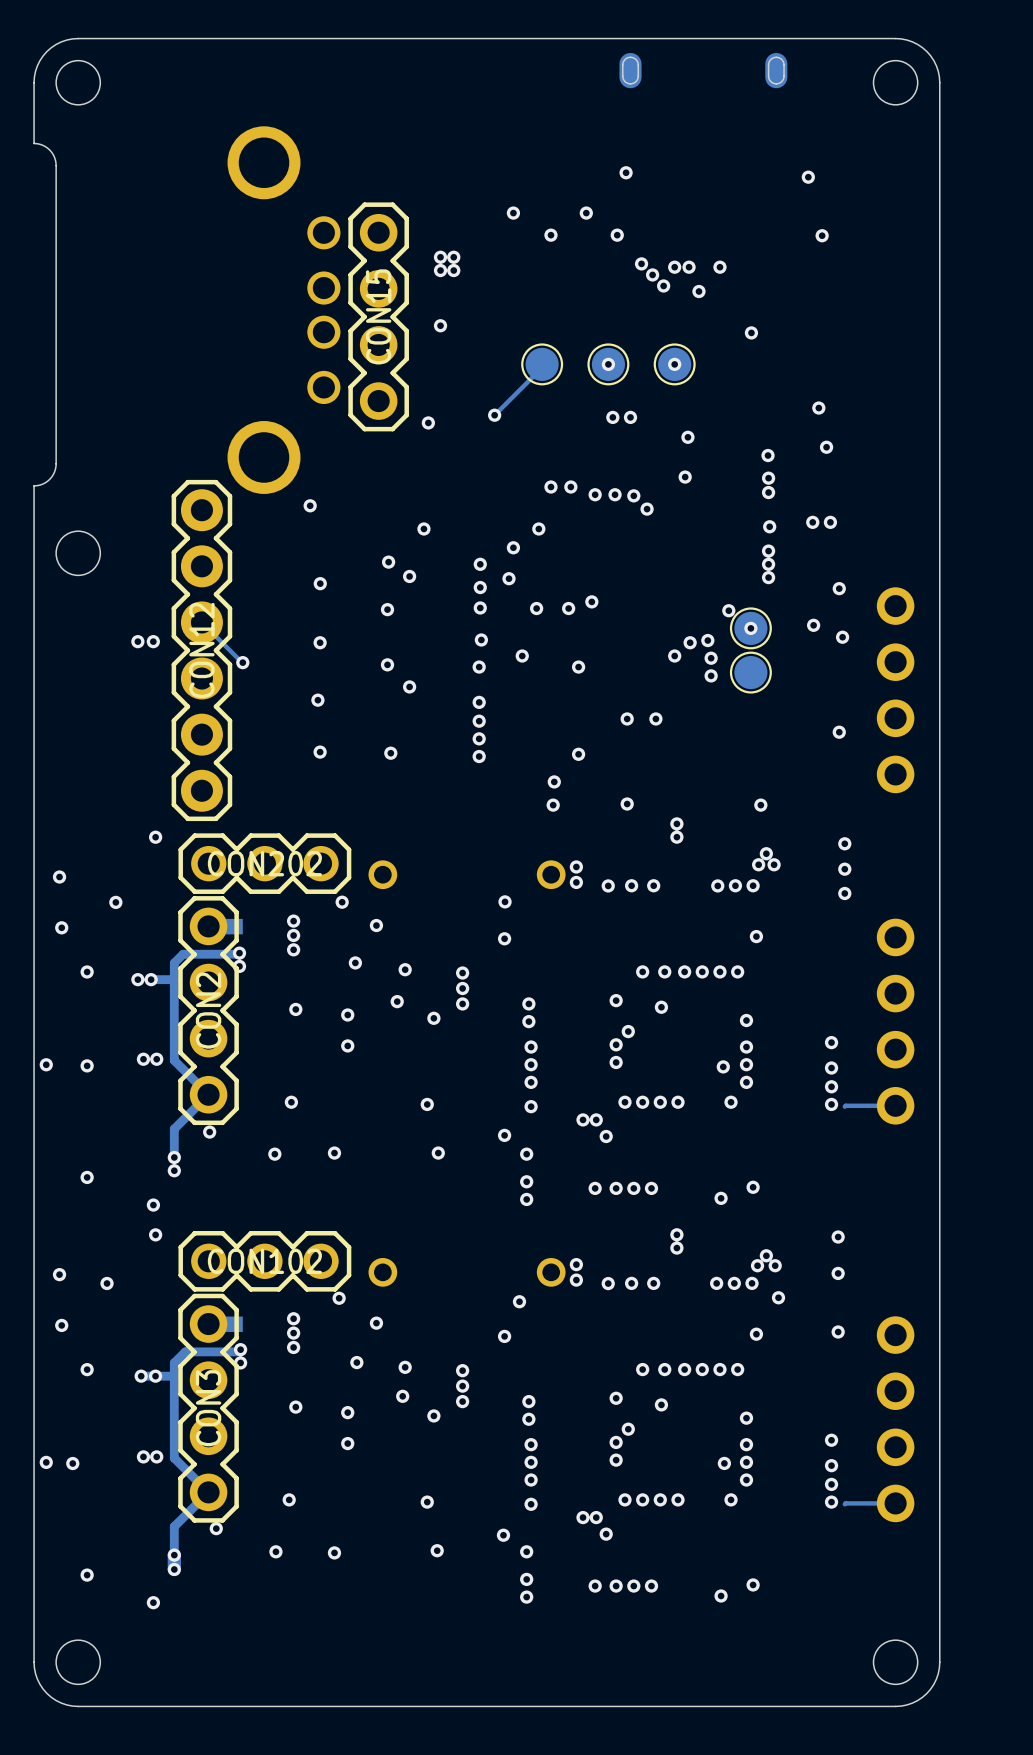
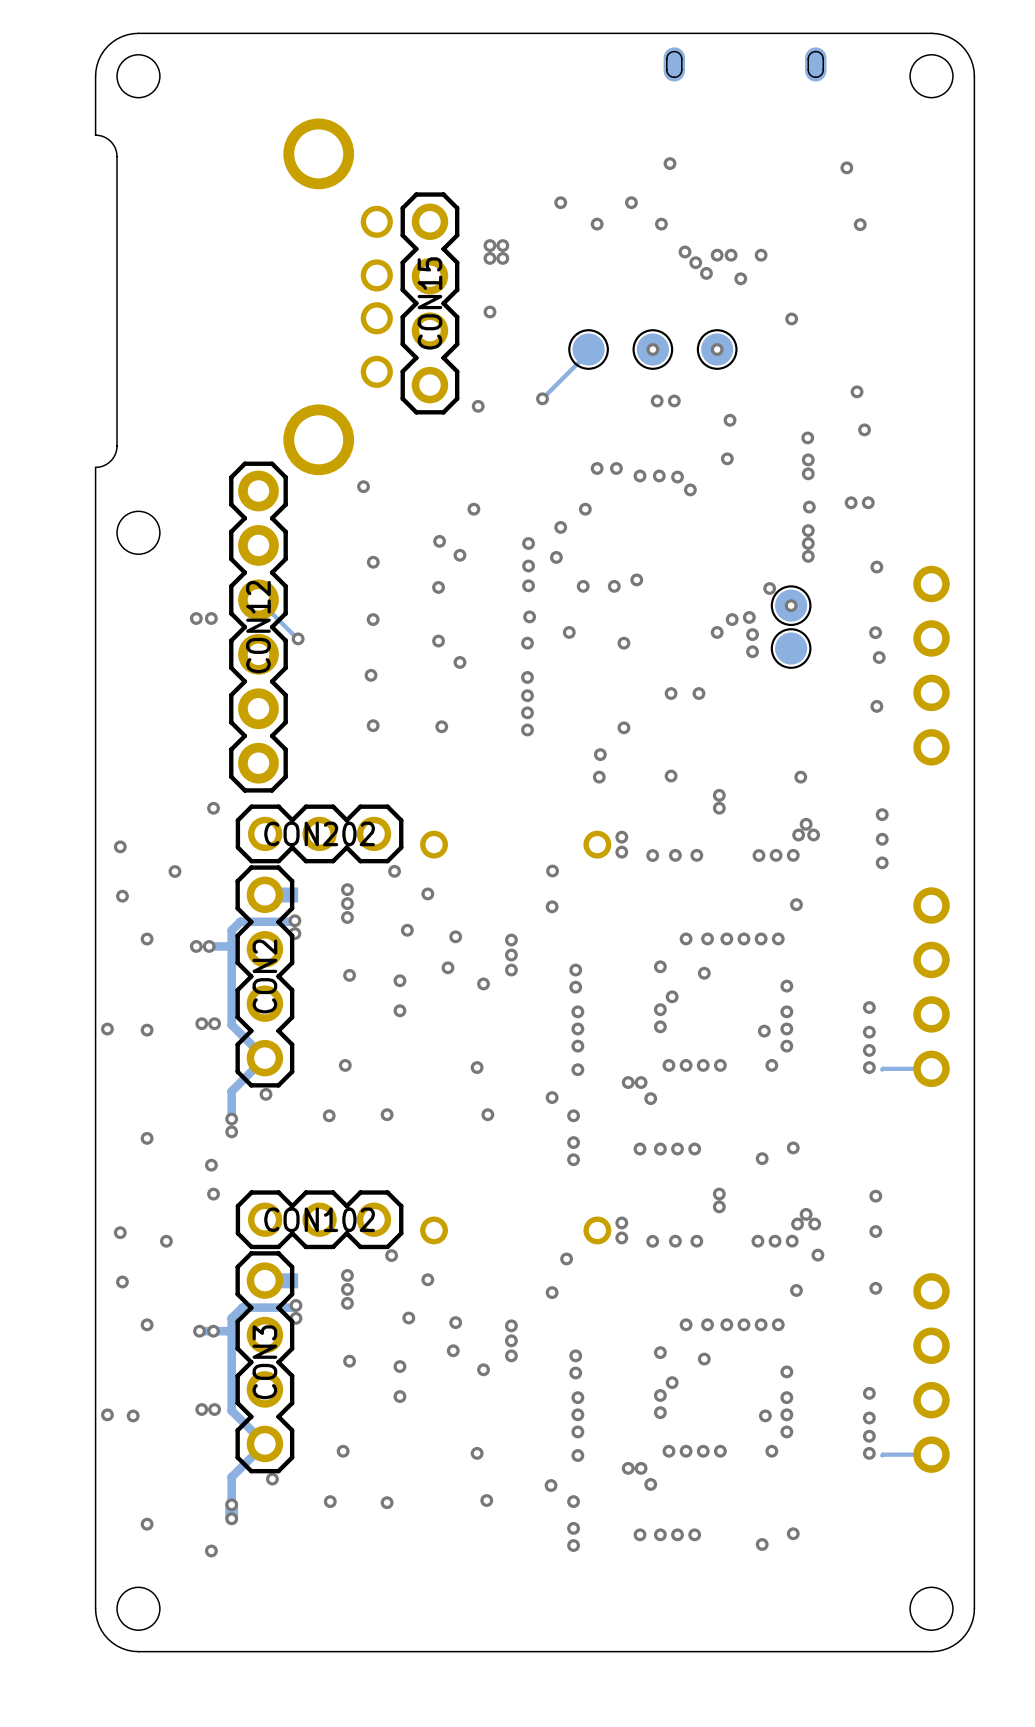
via: (813, 625) -> none
via: (842, 637) -> none
via: none -> (875, 632)
via: none -> (879, 657)

